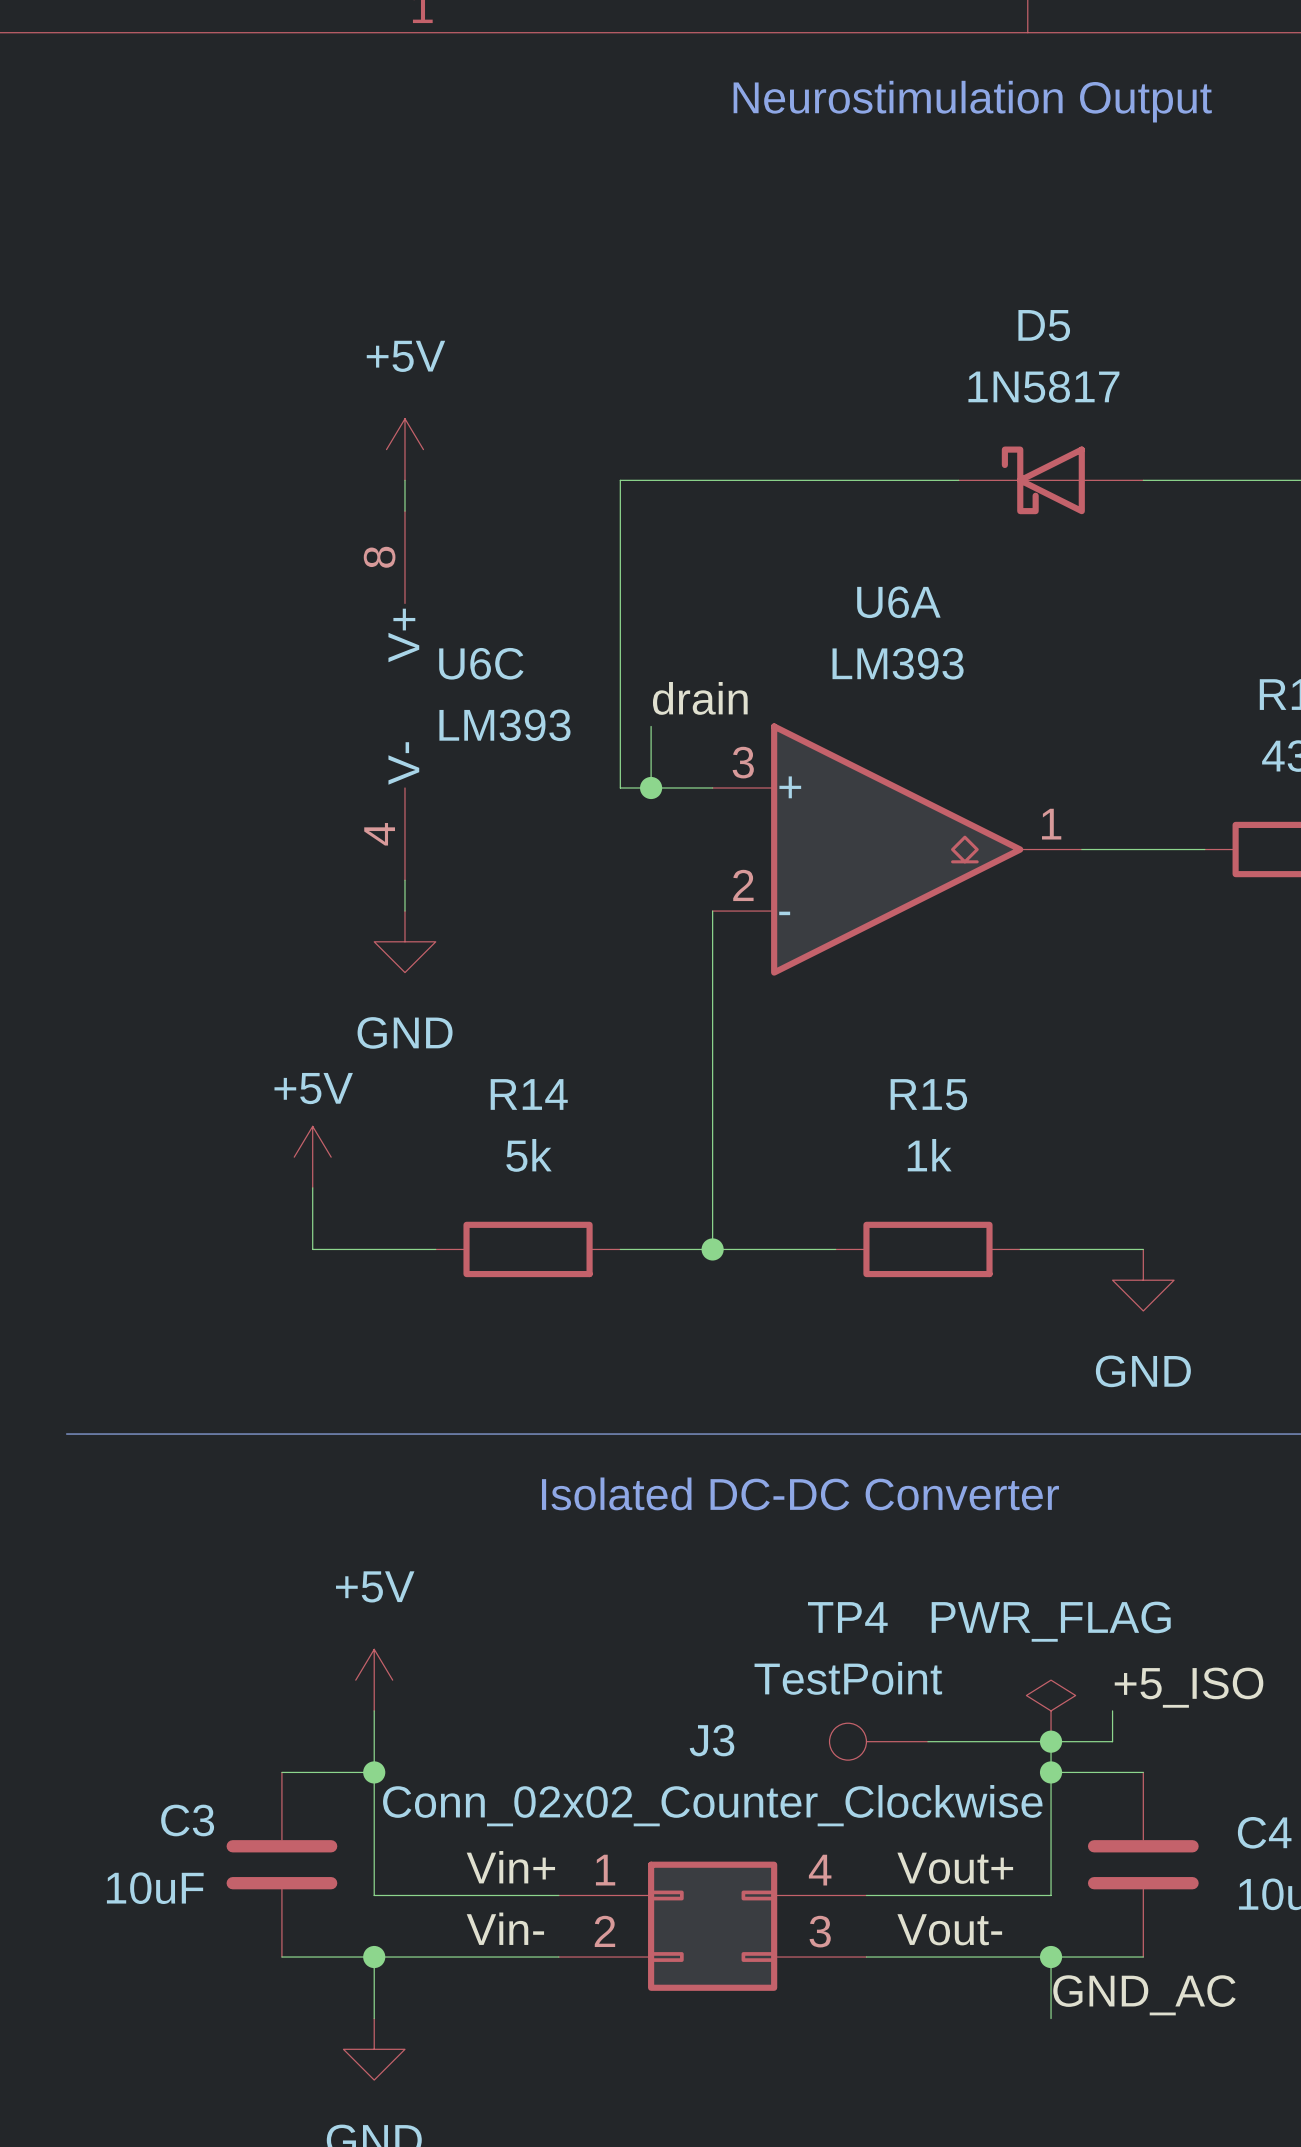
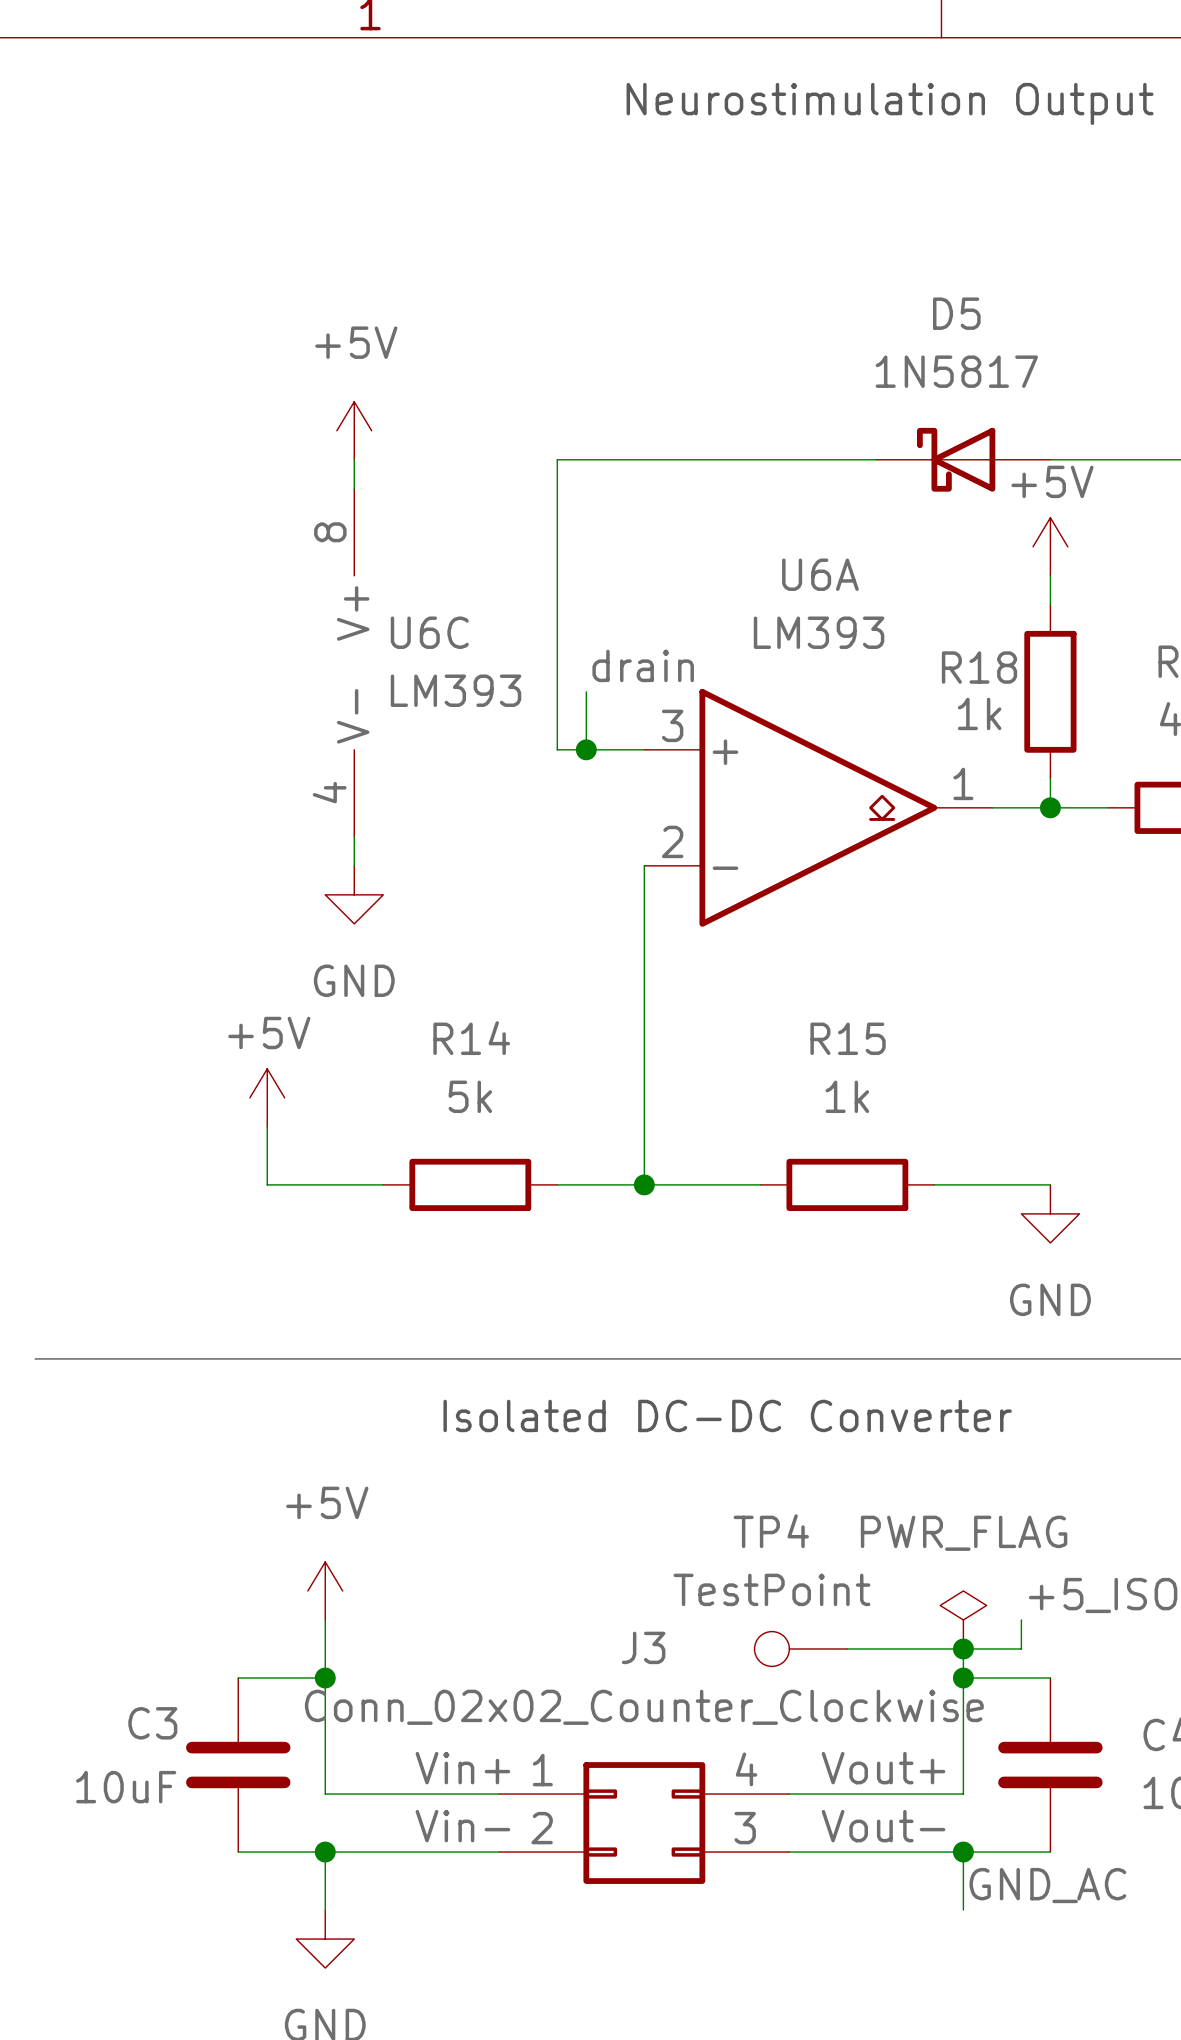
power symbol: none -> +5V (1050, 546)
wire: none -> (1050, 575) (1050, 604)
R18: none -> 1k (1050, 691)
wire: none -> (1050, 778) (1050, 807)
junction: none -> (1050, 807)

